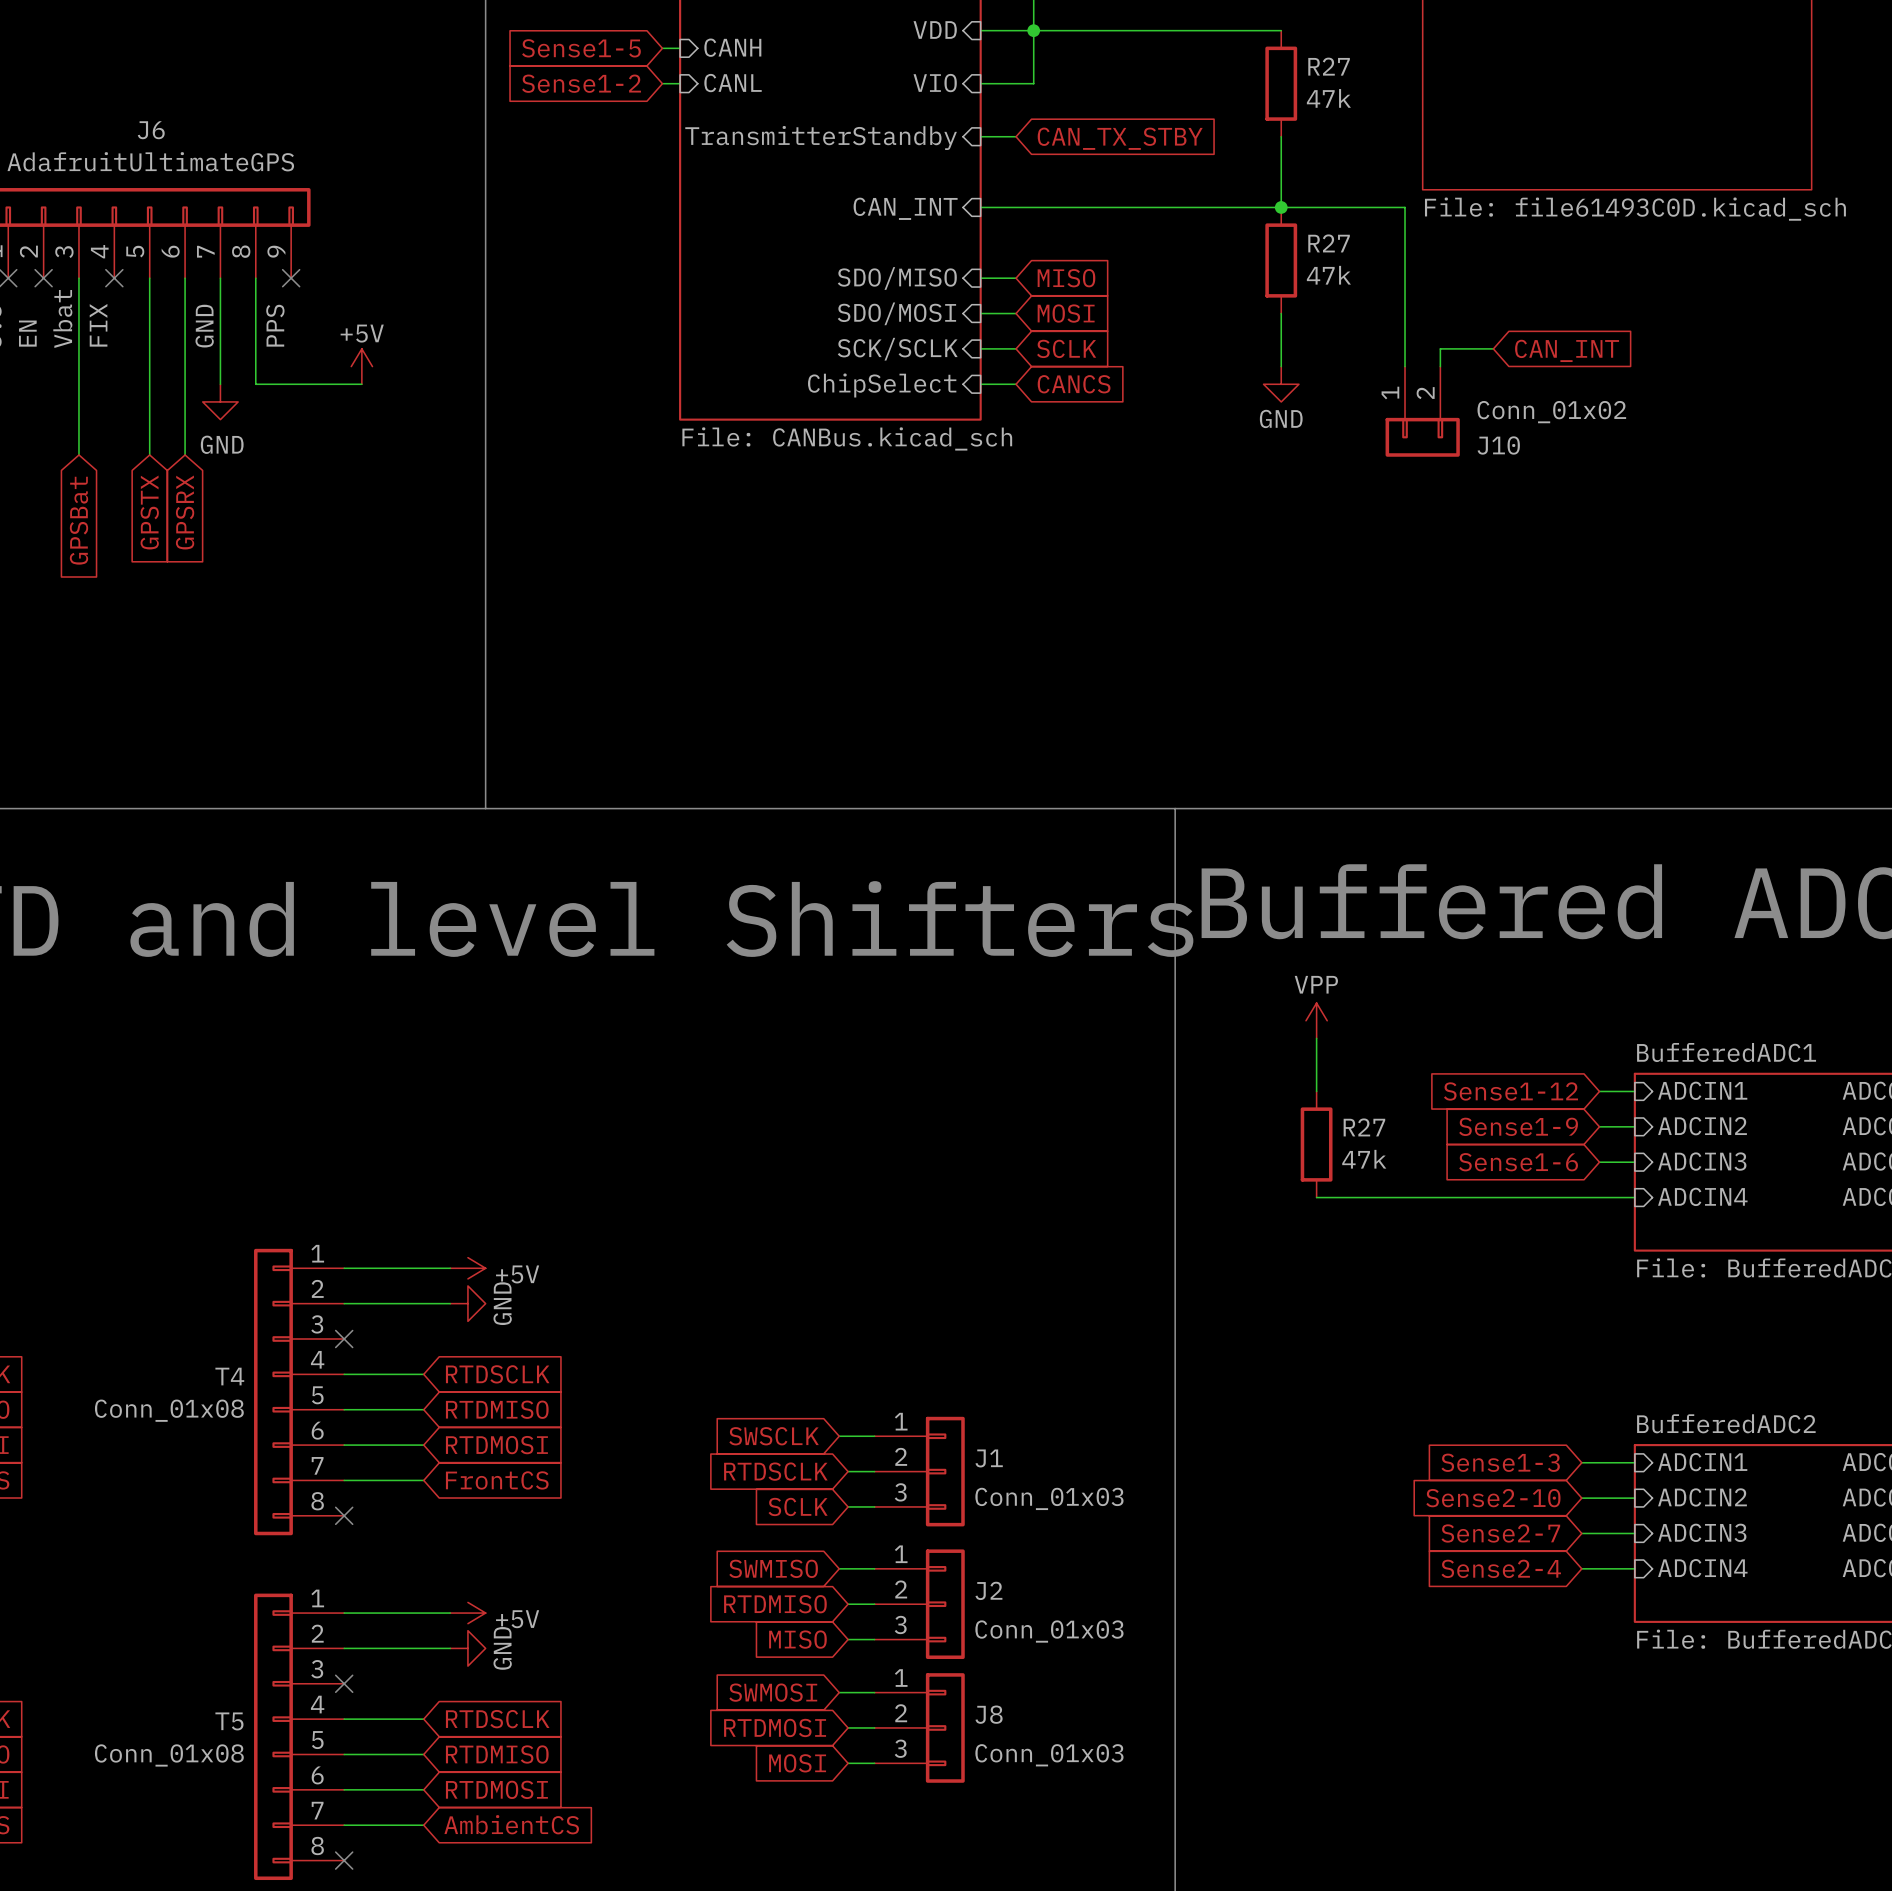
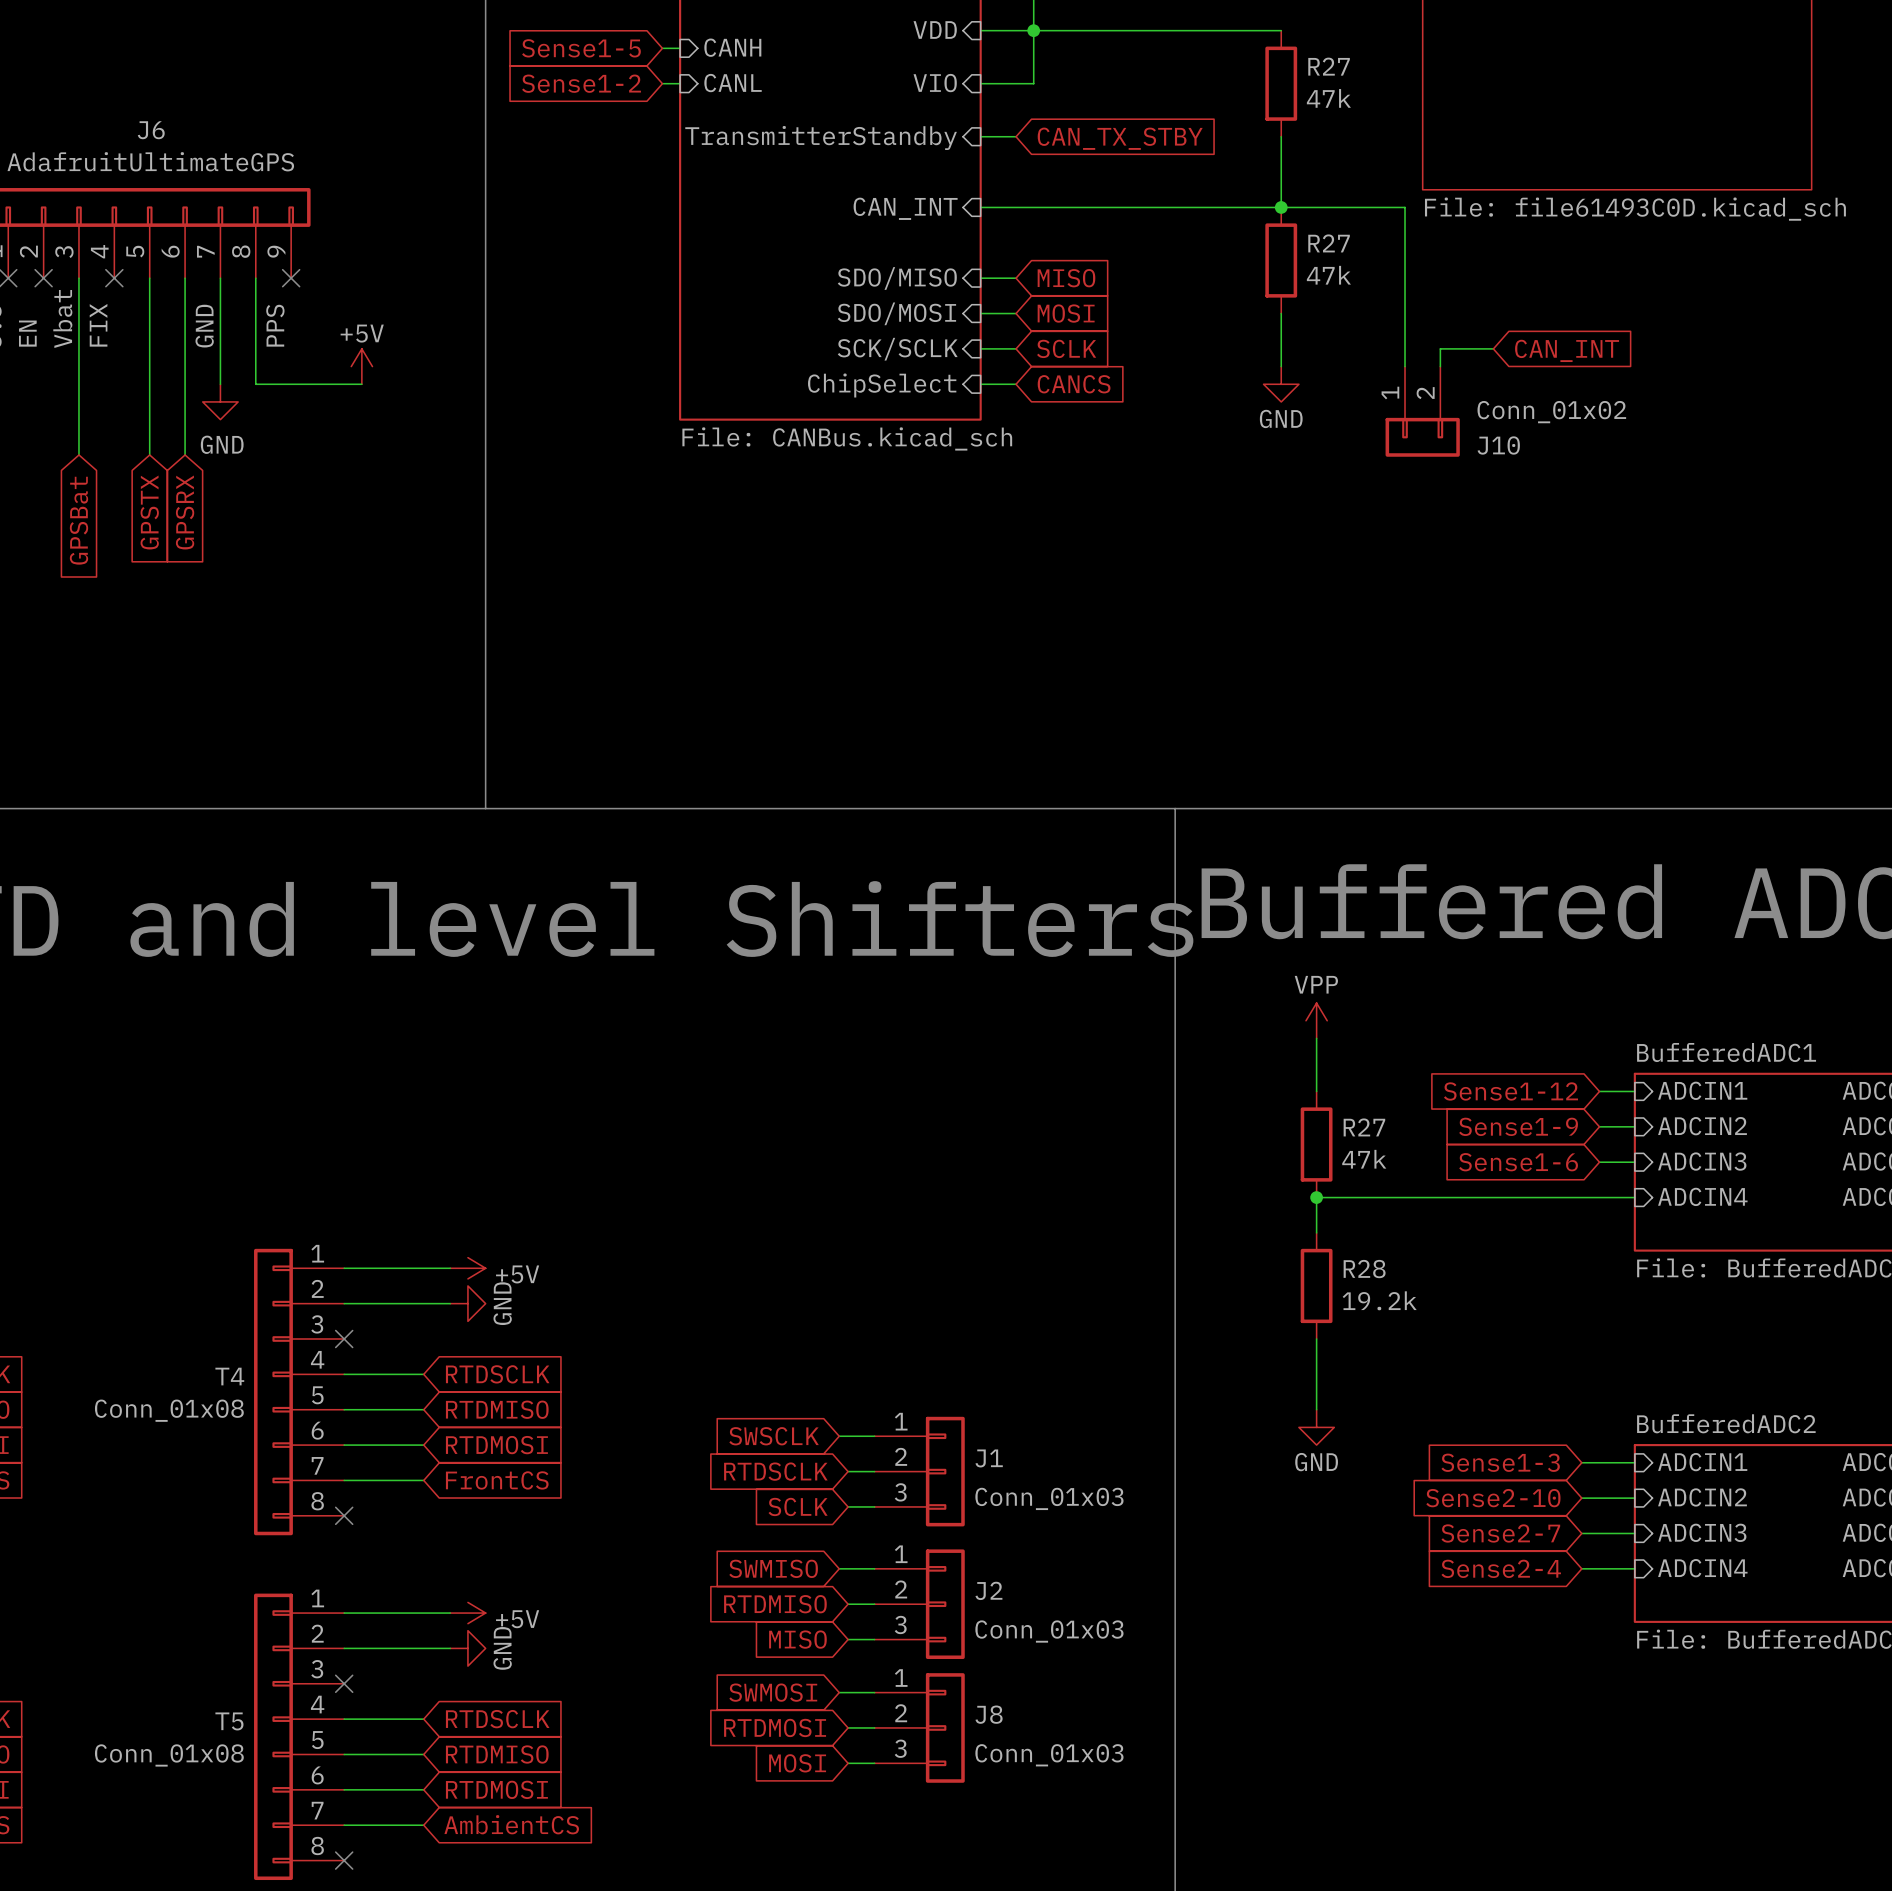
wire: none -> (1316, 1197) (1316, 1232)
junction: none -> (1316, 1197)
R28: none -> 19.2k (1316, 1285)
wire: none -> (1316, 1339) (1316, 1409)
power symbol: none -> GND (1316, 1427)

